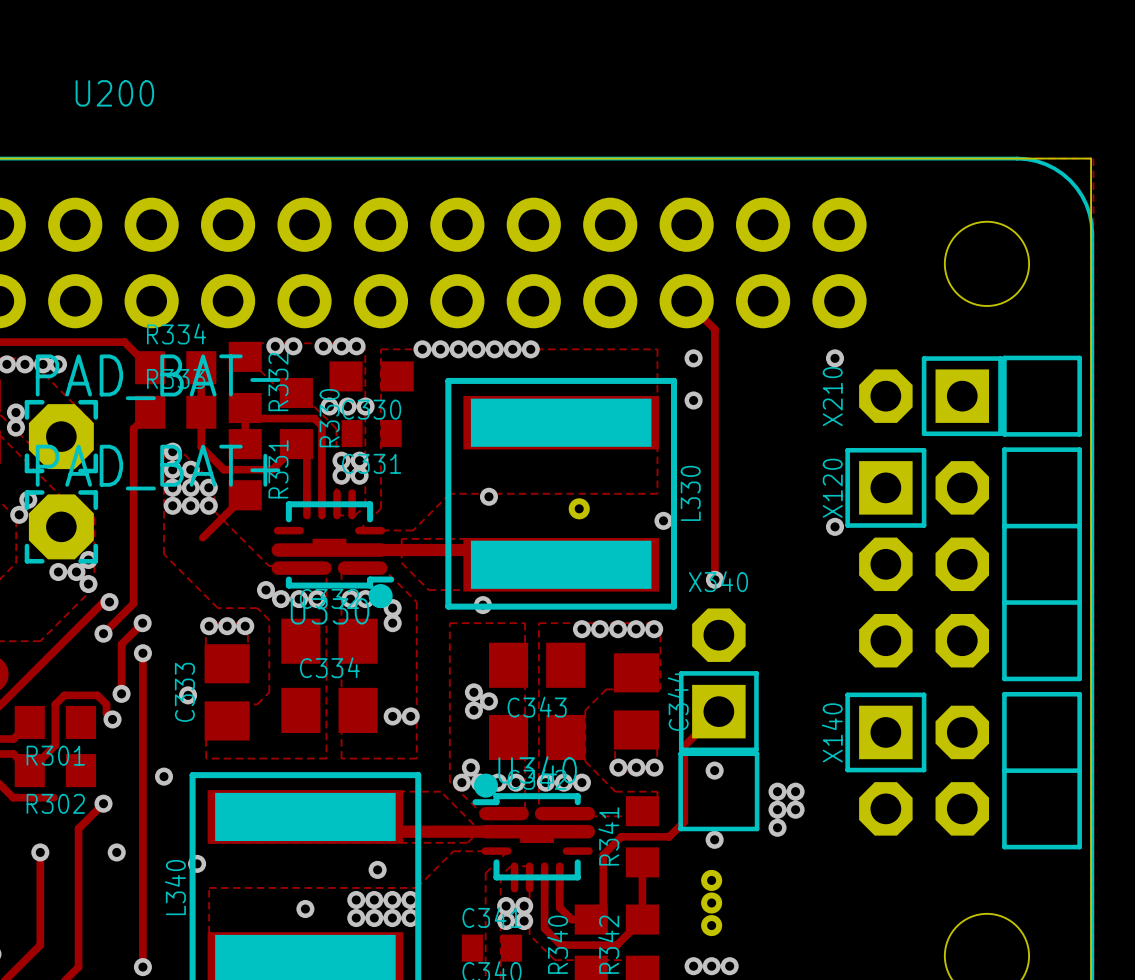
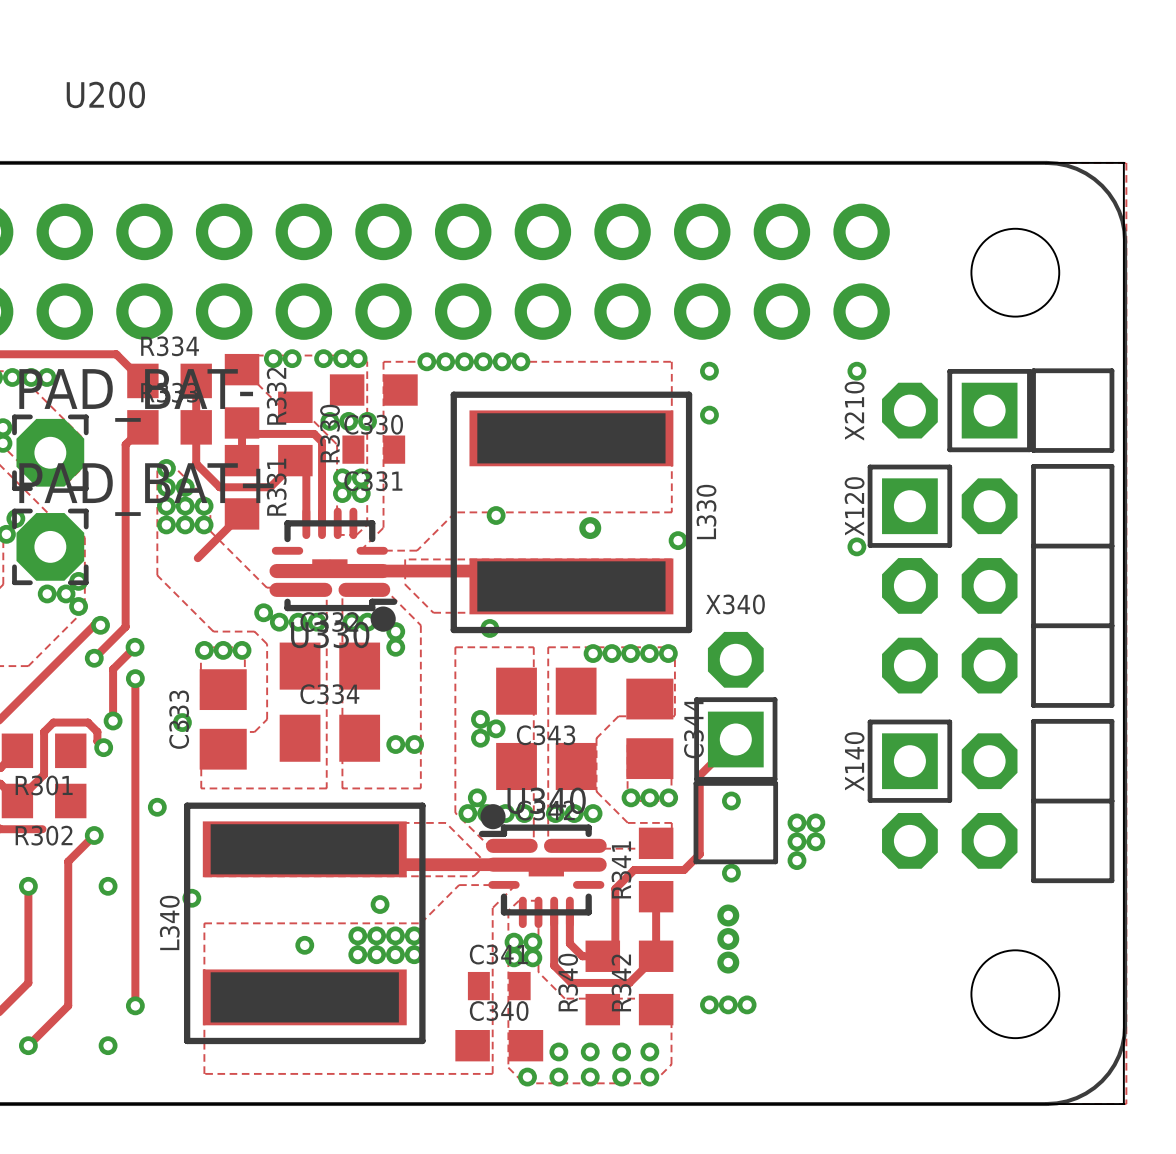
track: (686, 301) (714, 329) (714, 579) -> none
via: (530, 349) -> none
via: (714, 579) -> none

